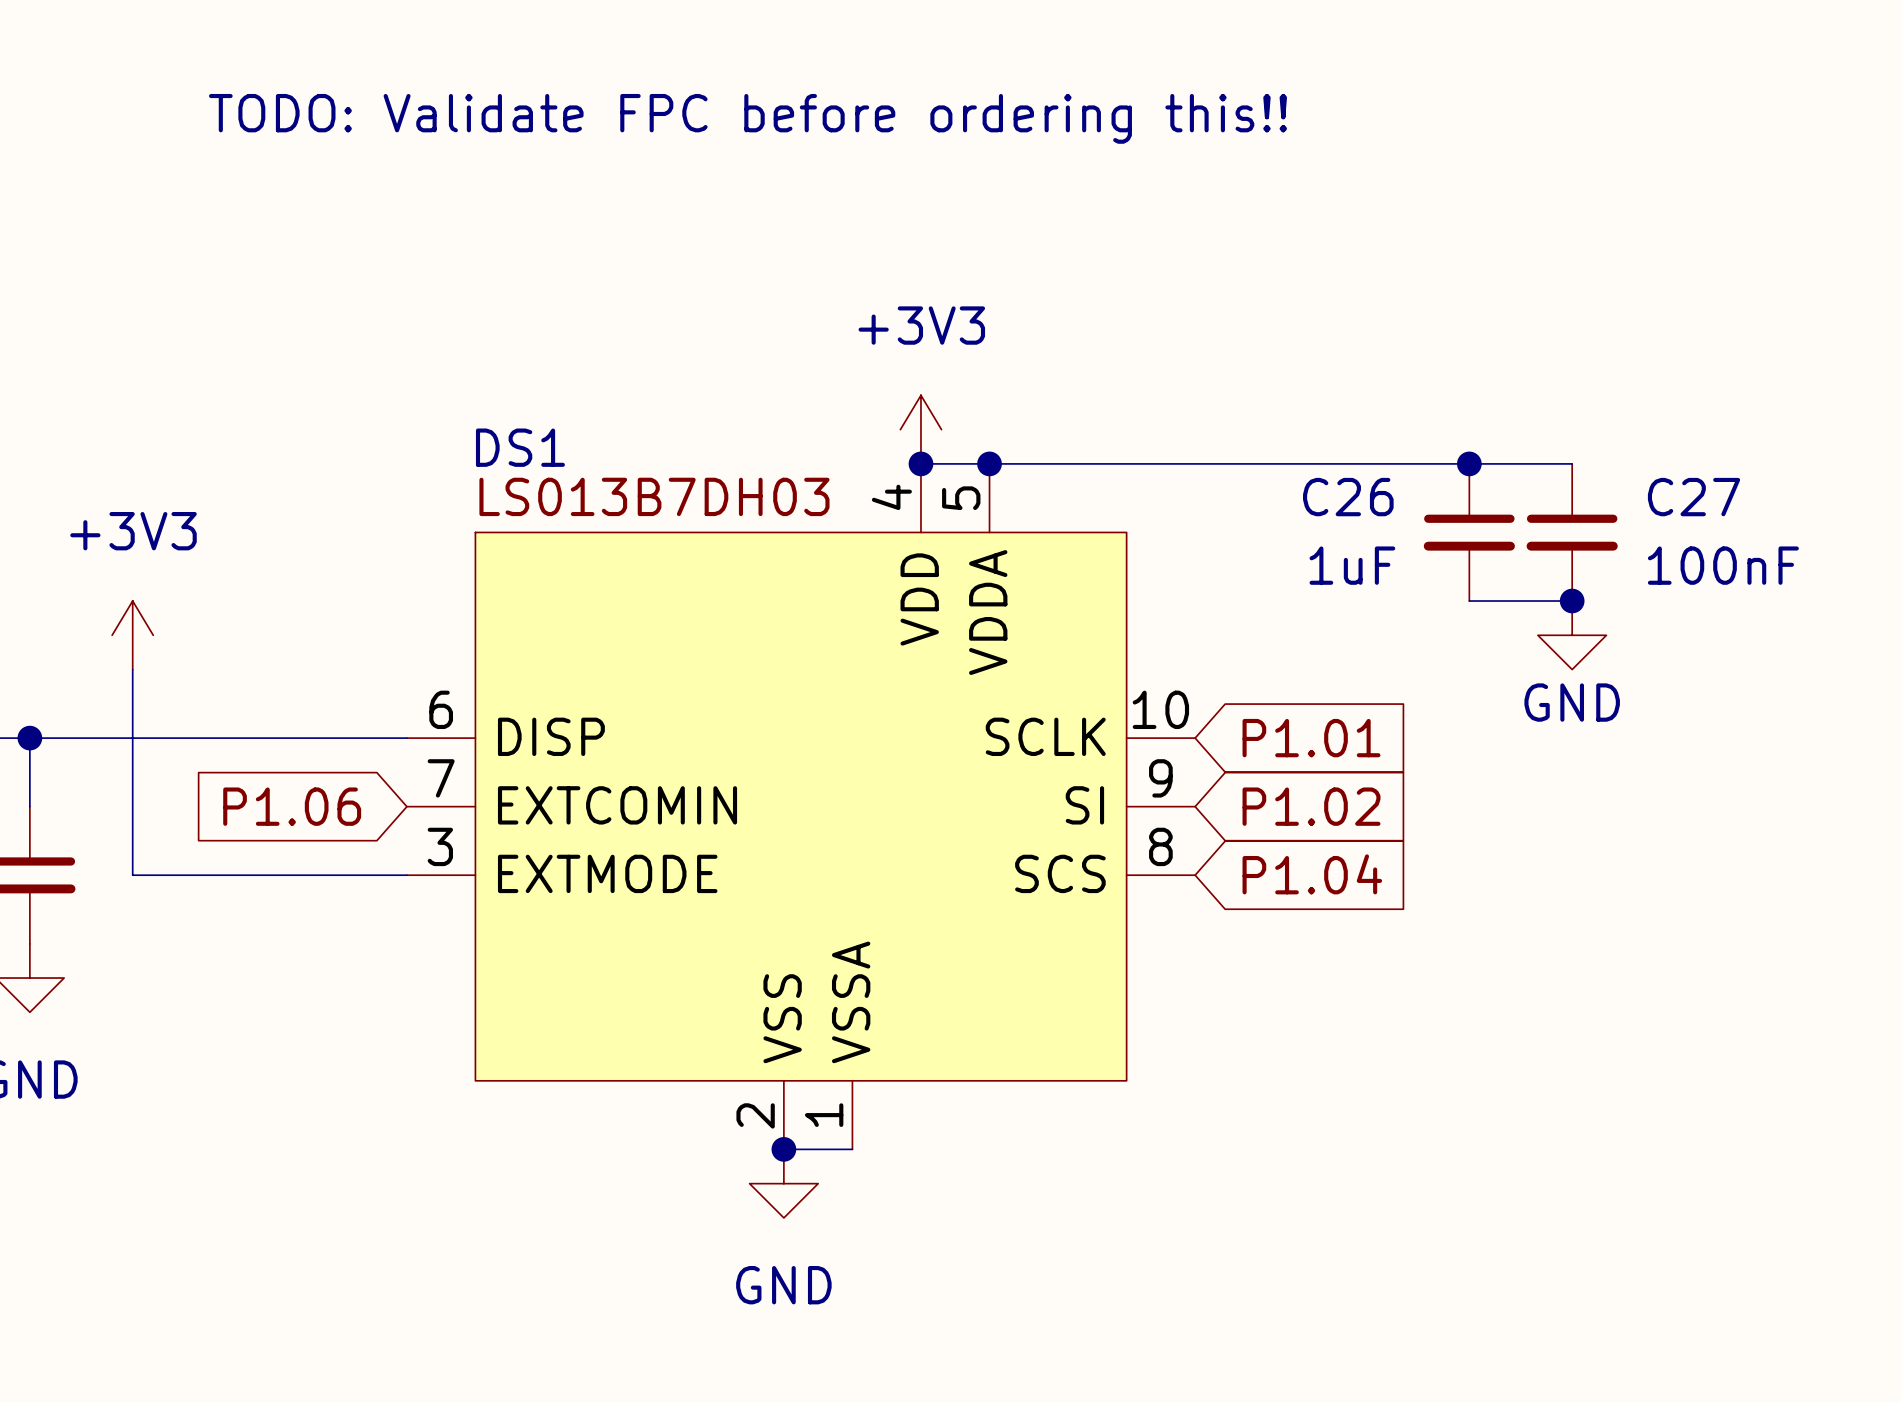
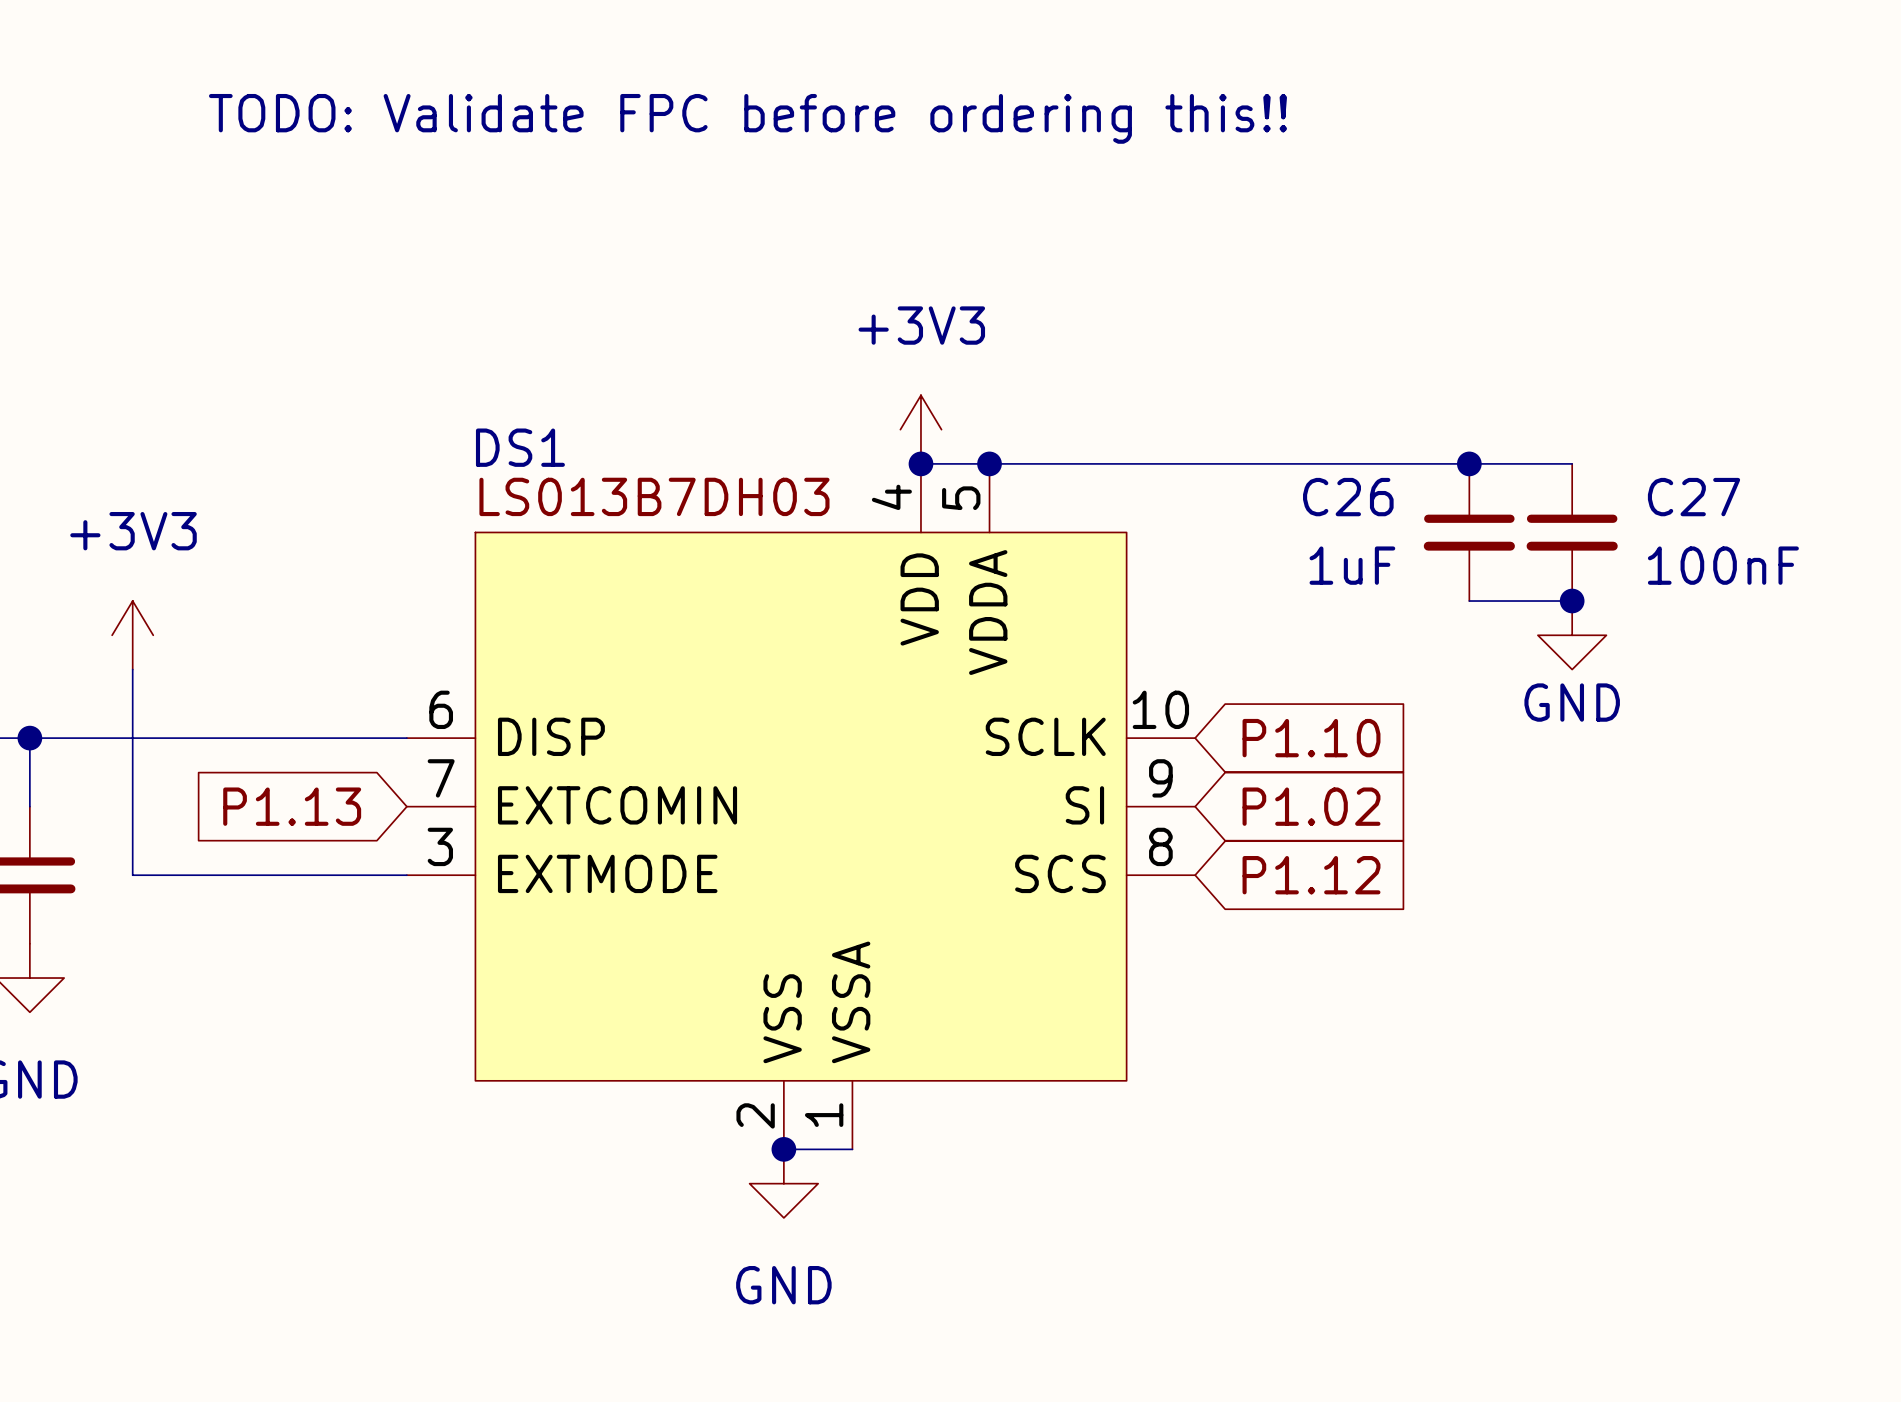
global label: P1.01 (1311, 738) -> P1.10 (1311, 738)
global label: P1.06 (292, 806) -> P1.13 (292, 806)
global label: P1.04 (1312, 874) -> P1.12 (1311, 875)

